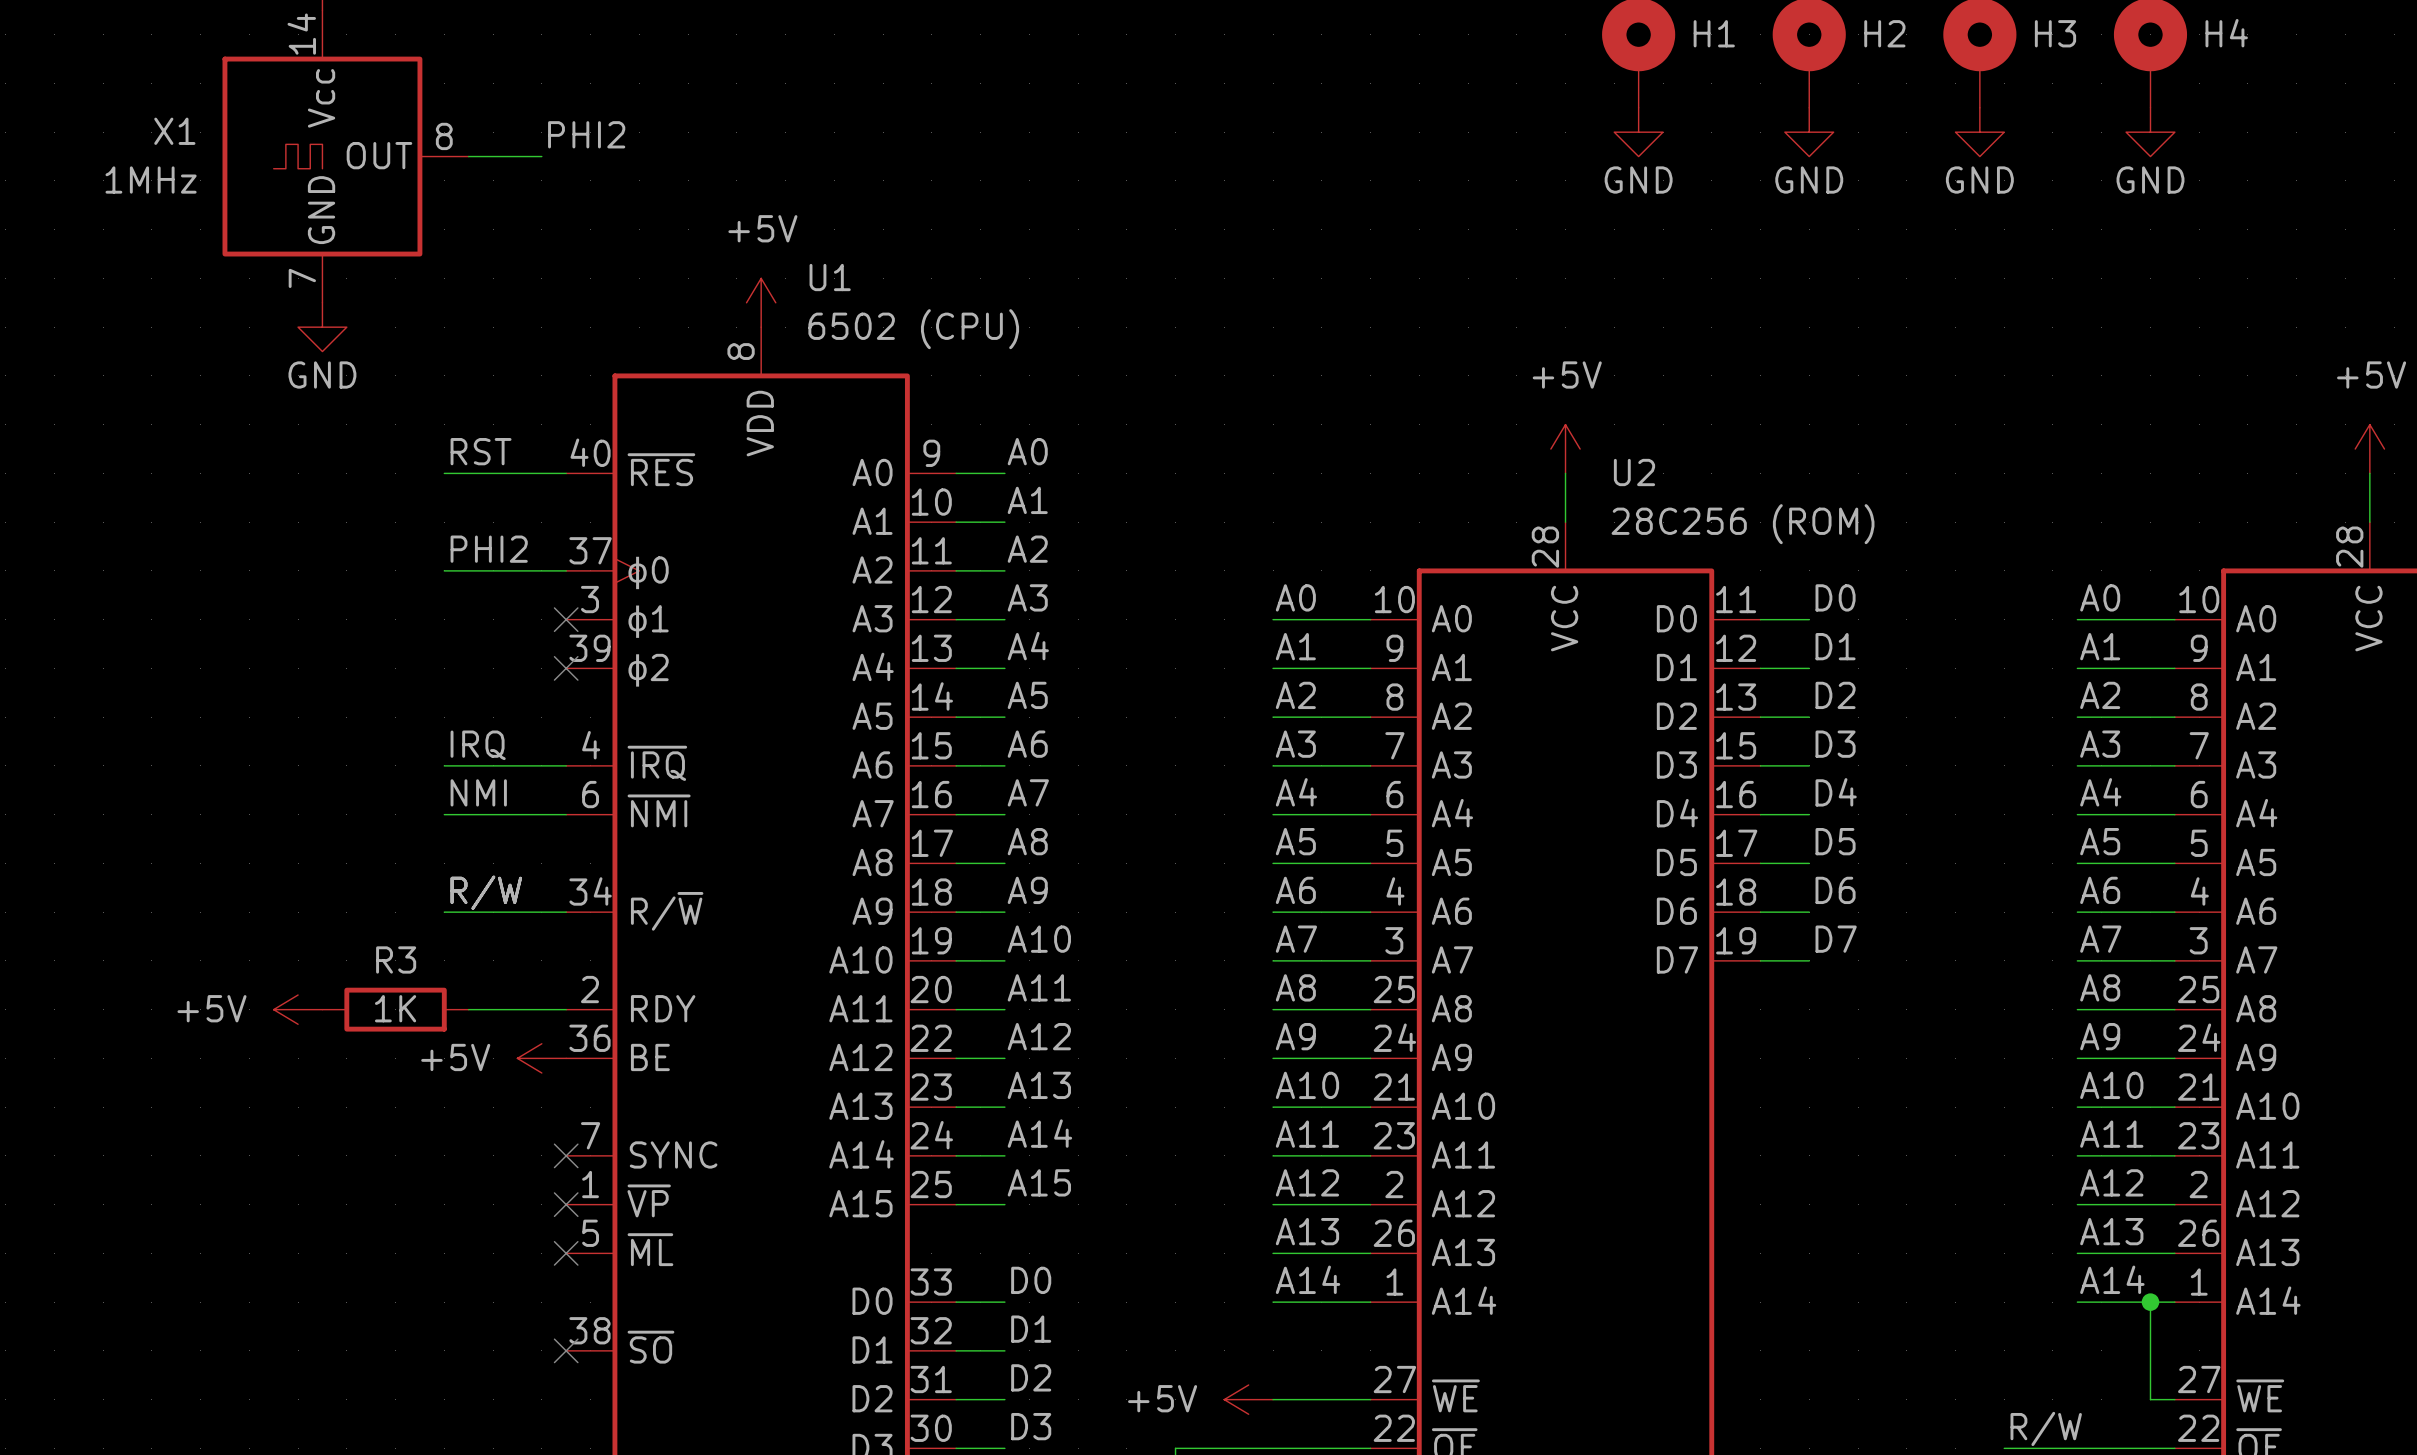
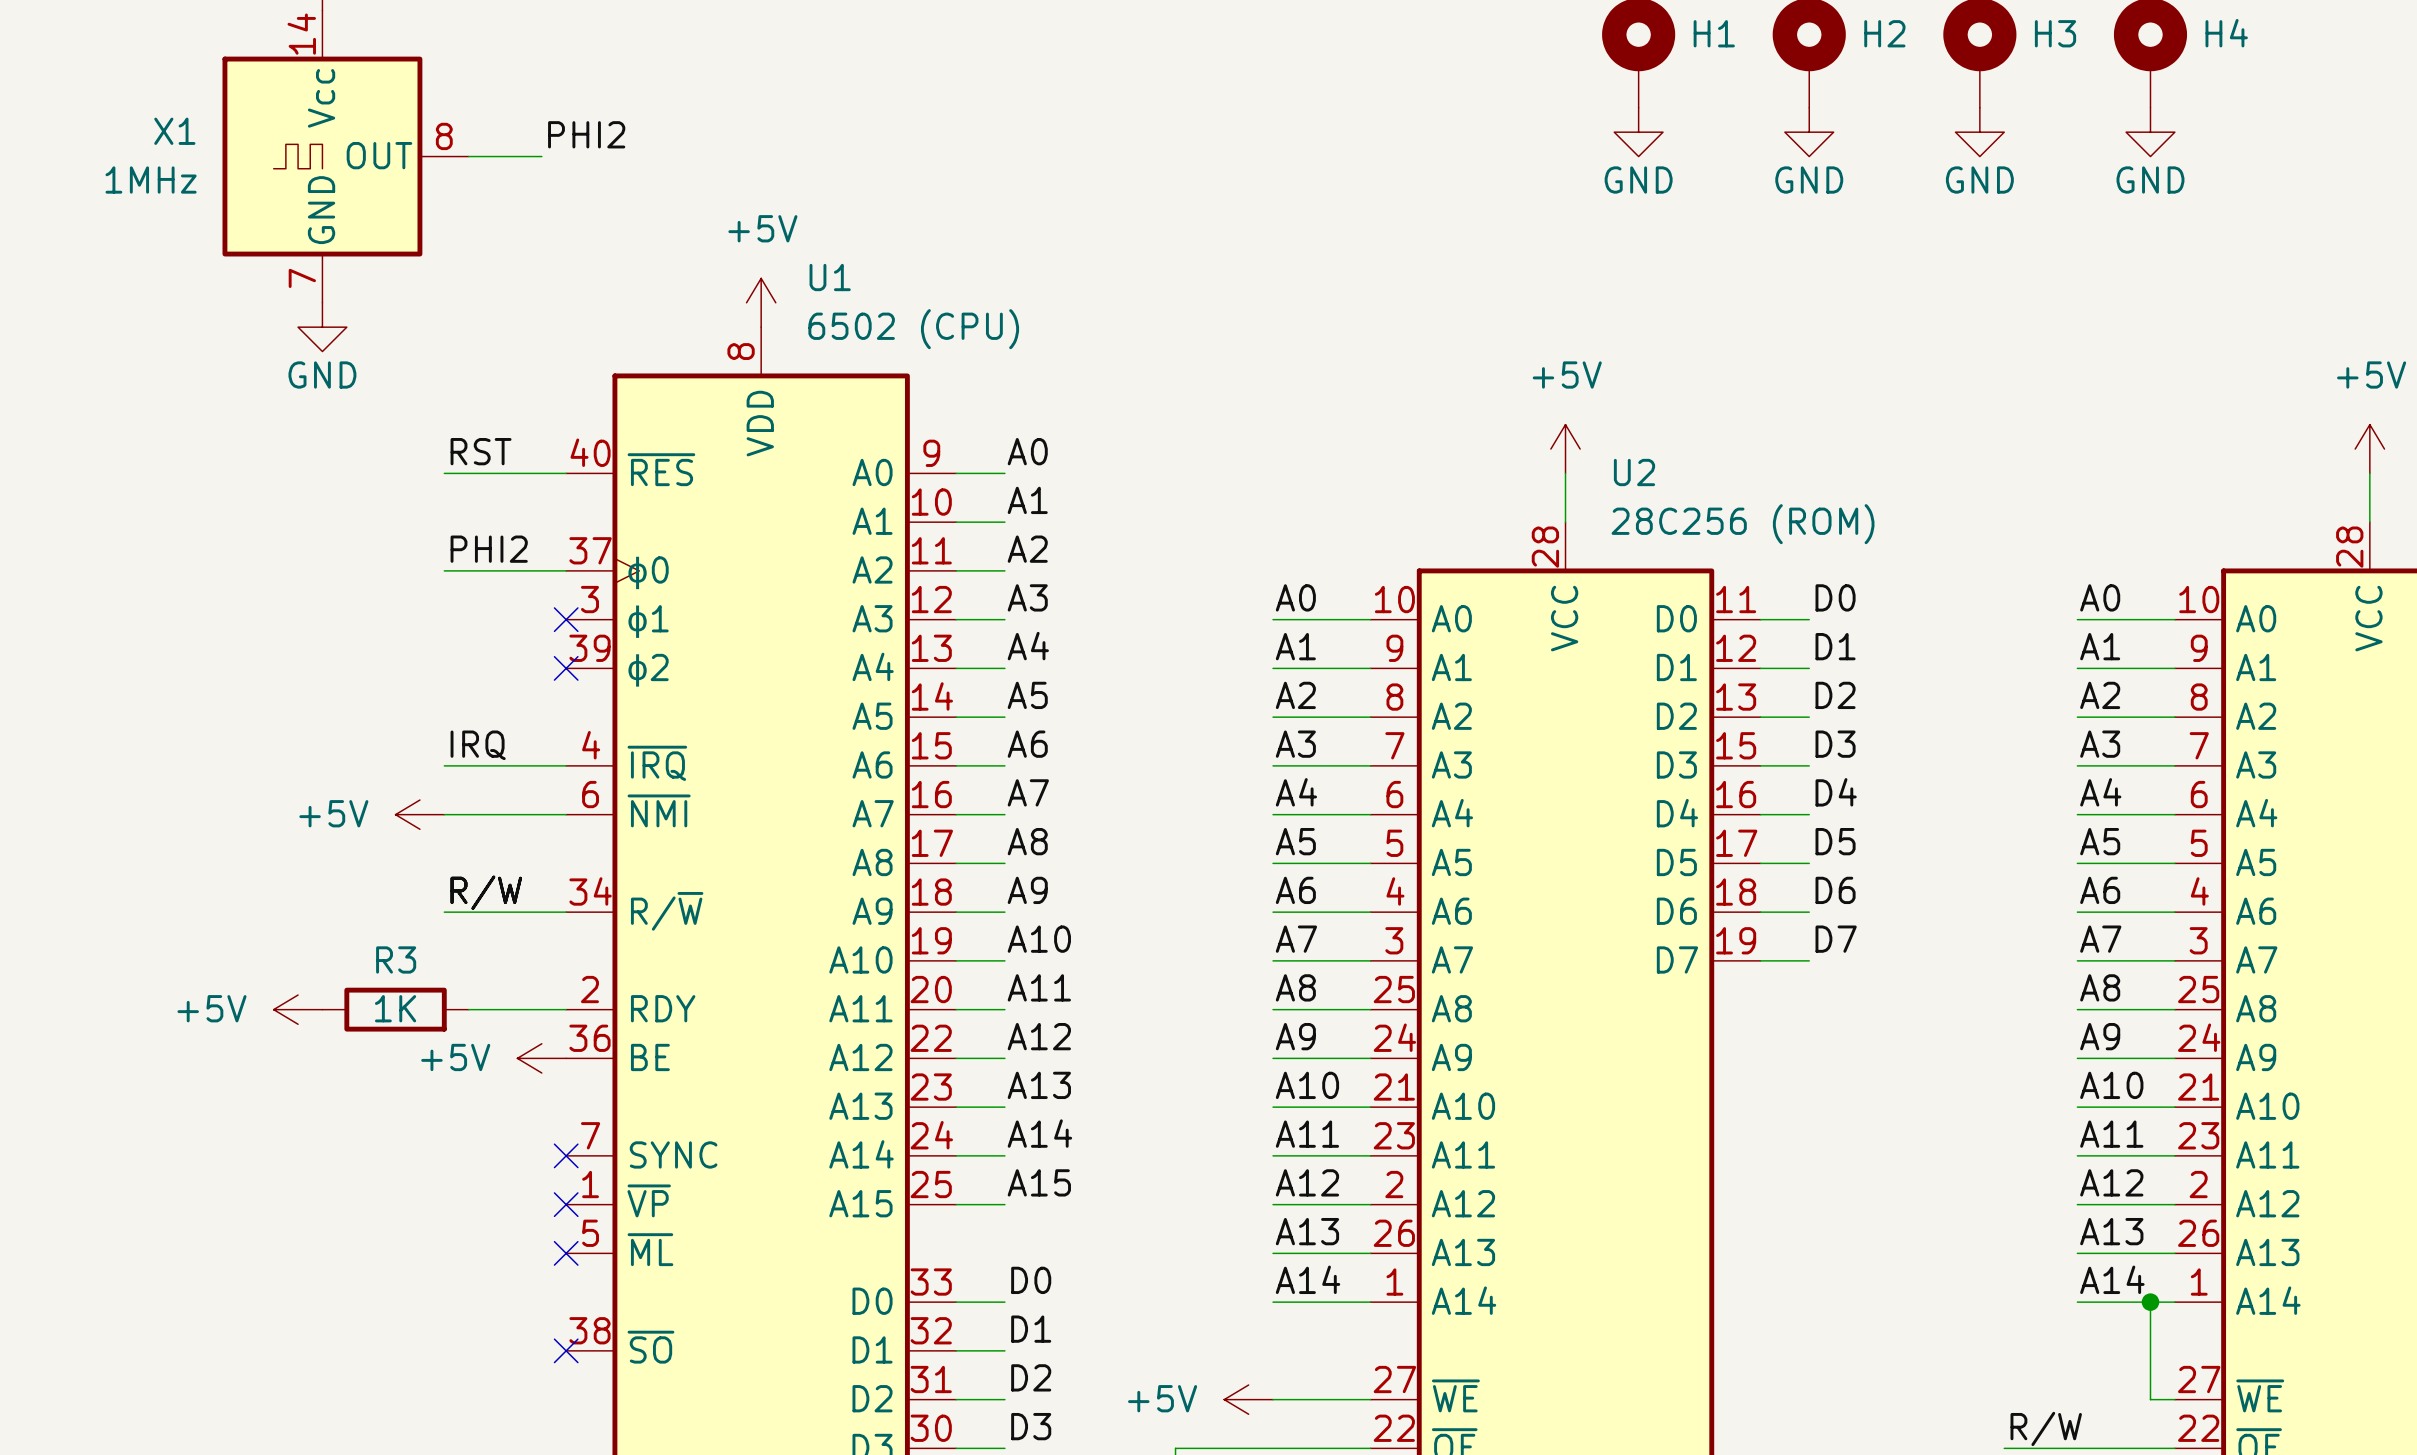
label: NMI (478, 792) -> none
power symbol: none -> +5V (419, 814)

